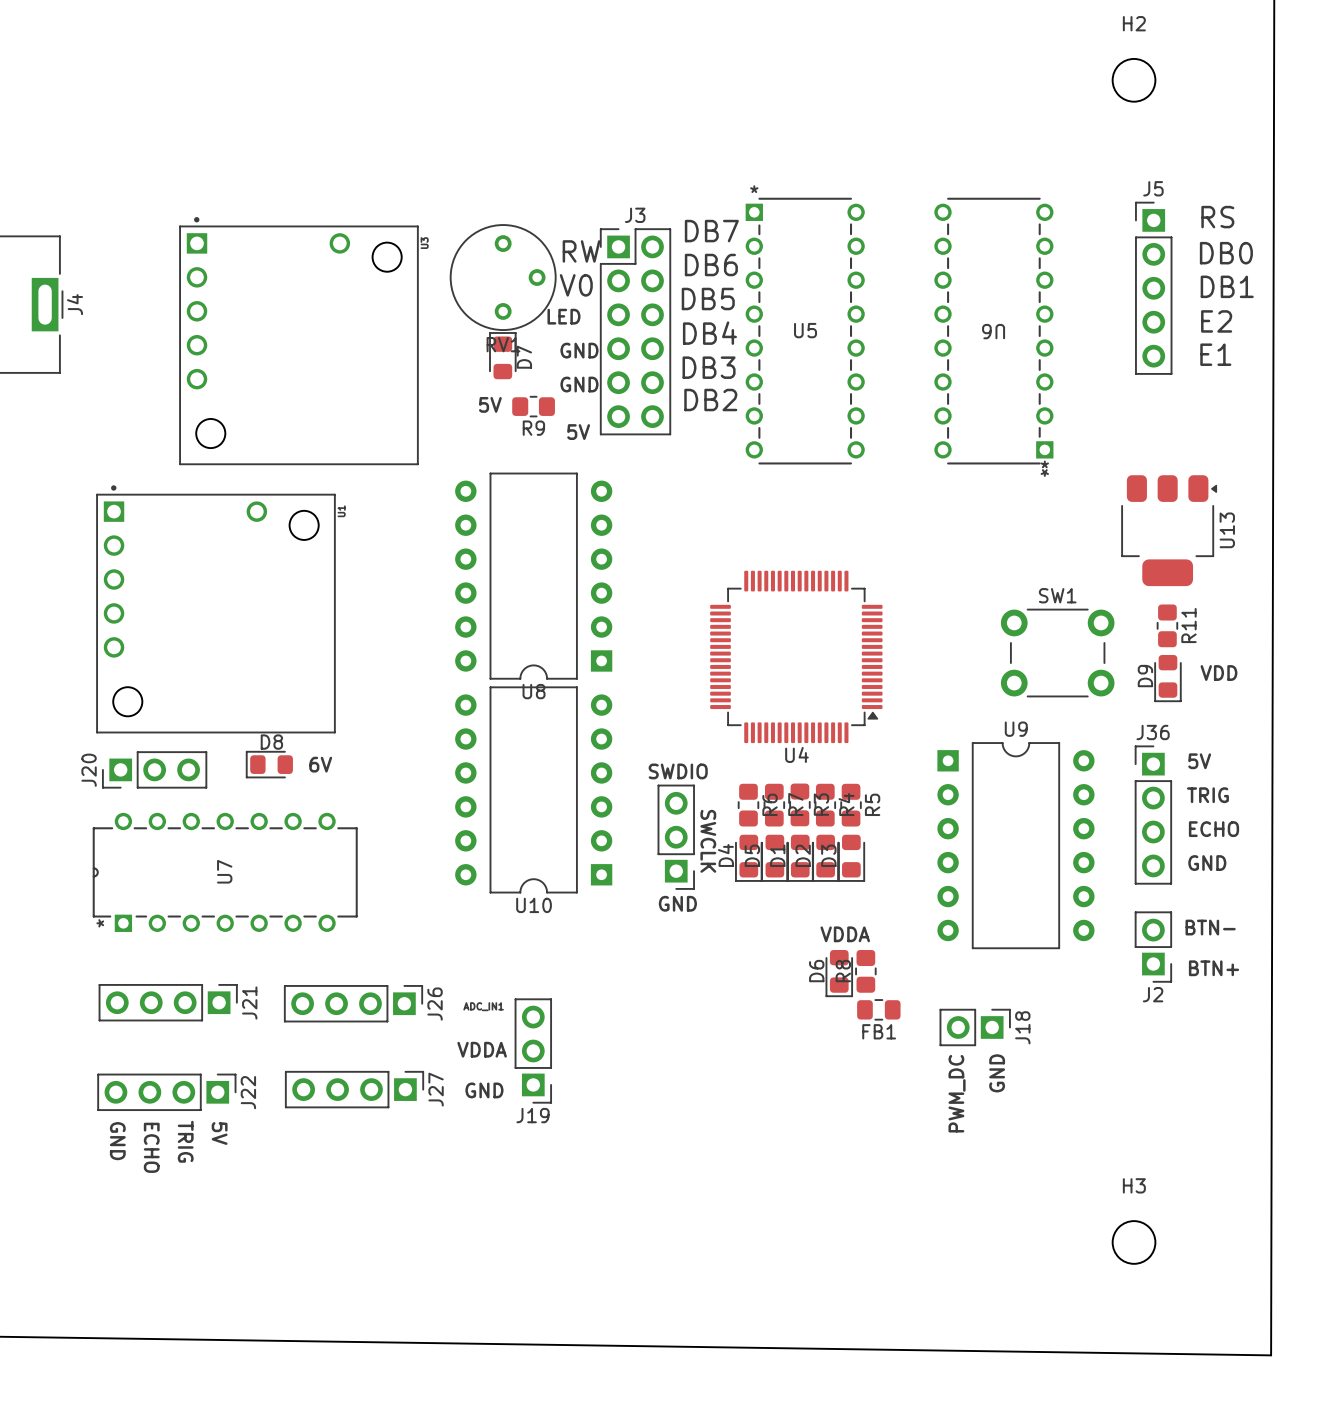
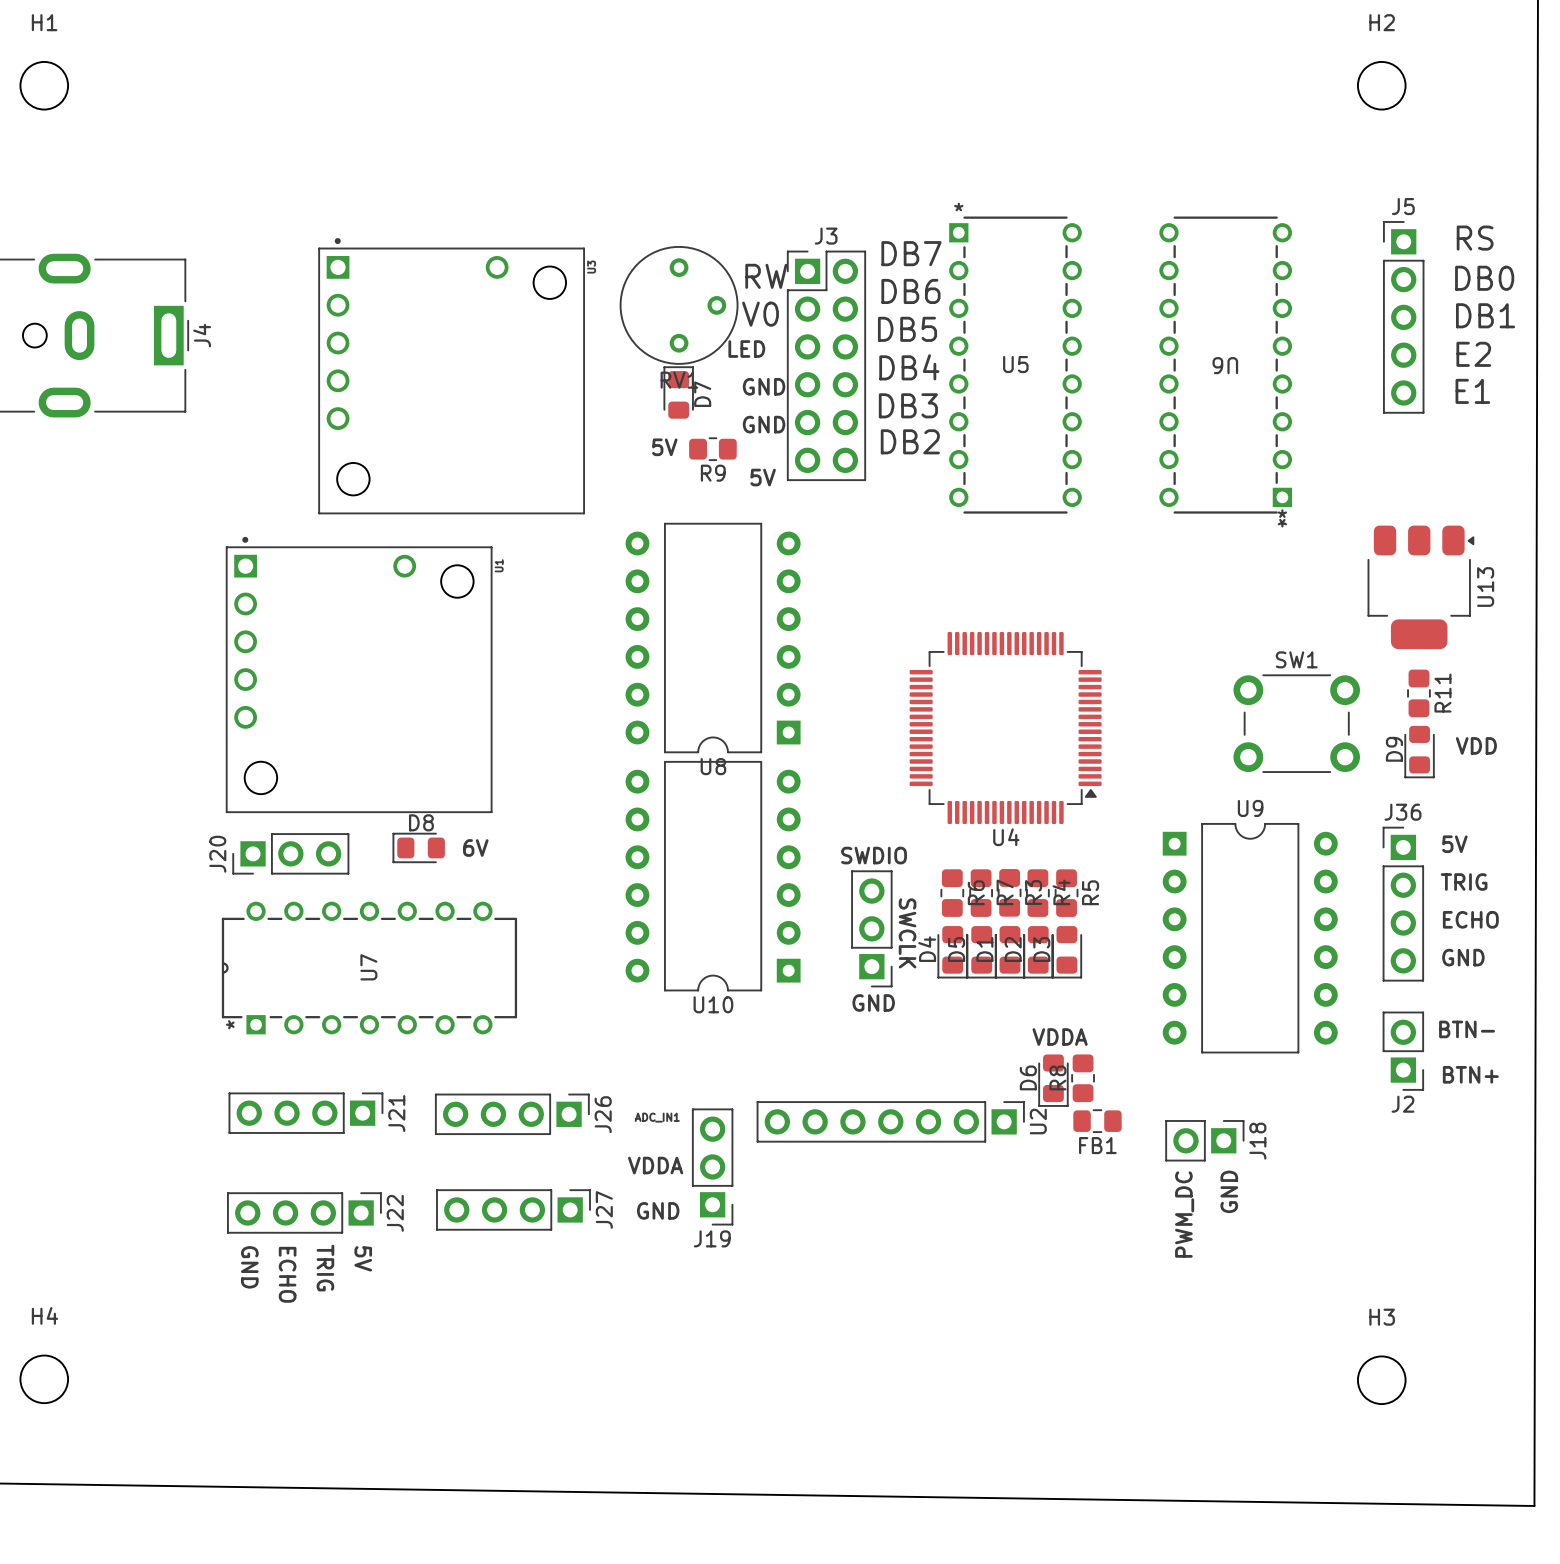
U2: none -> (890, 1121)

